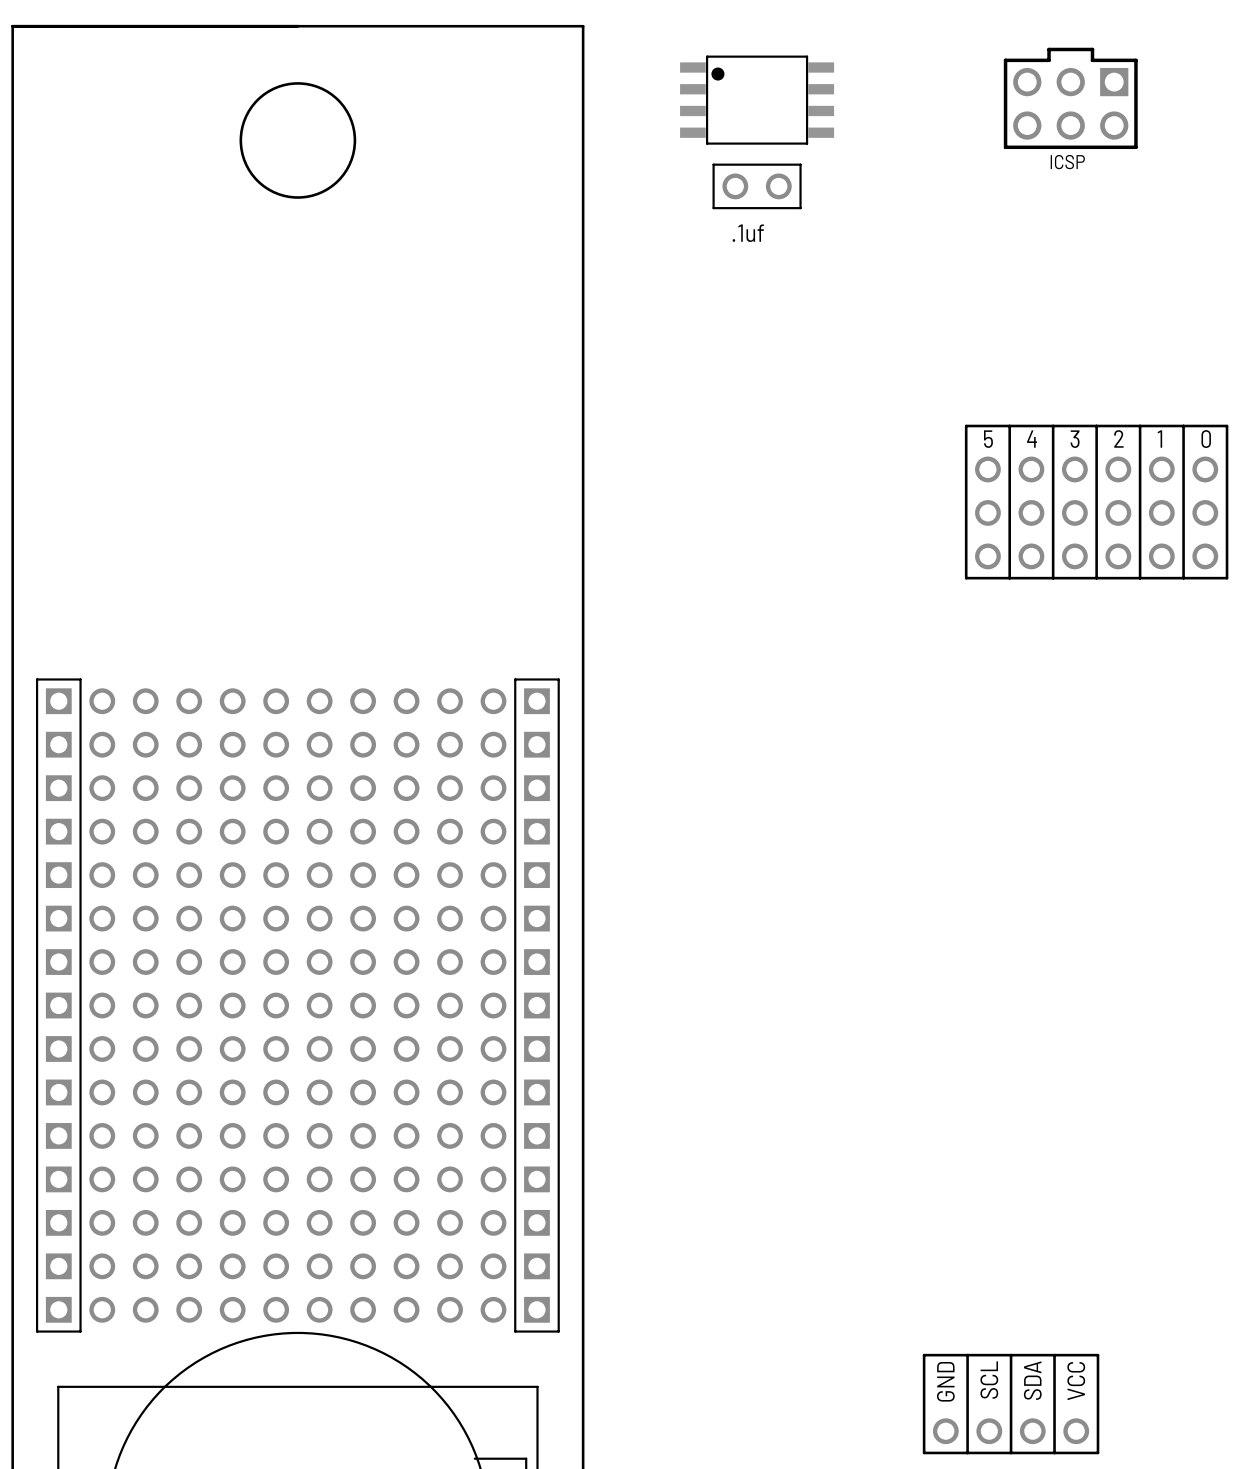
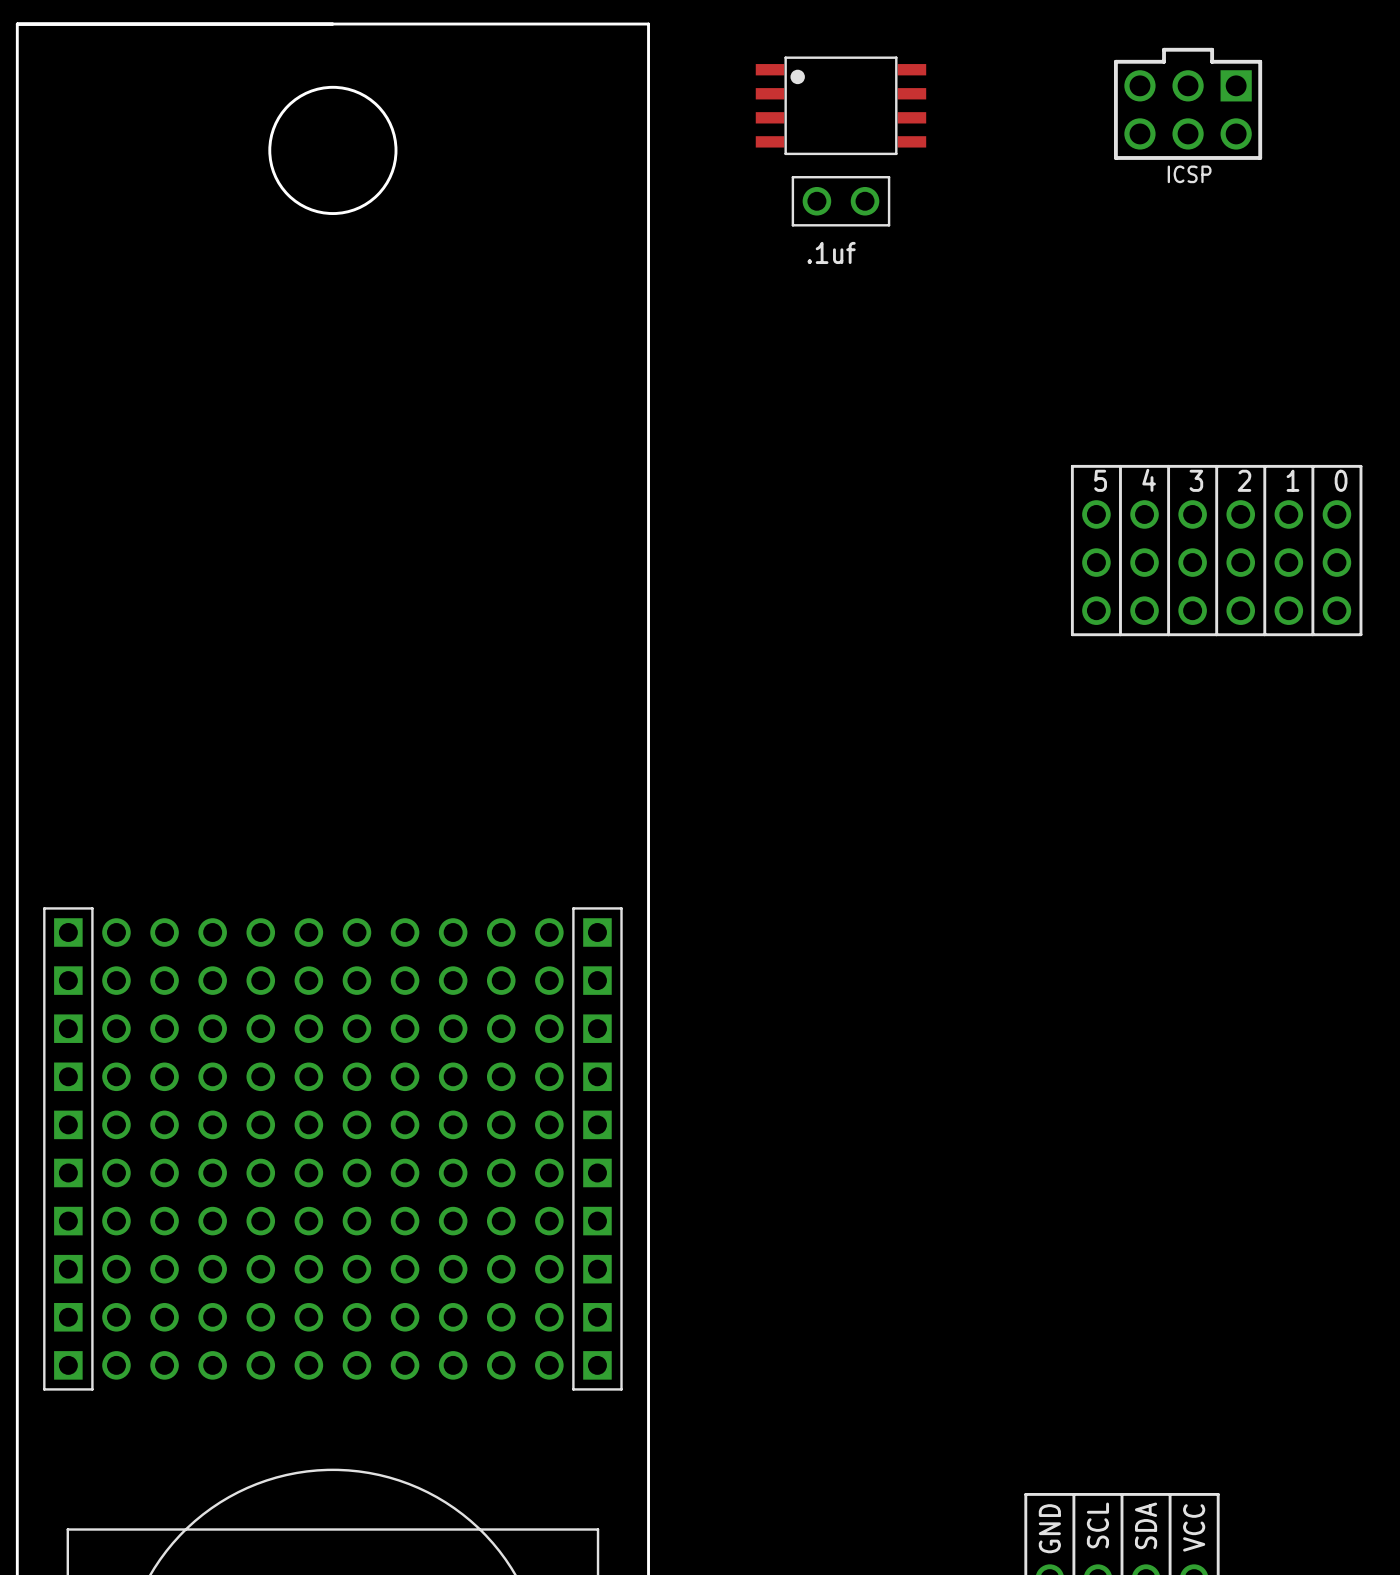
part: (297, 1005) -> none
part: none -> (332, 1148)

